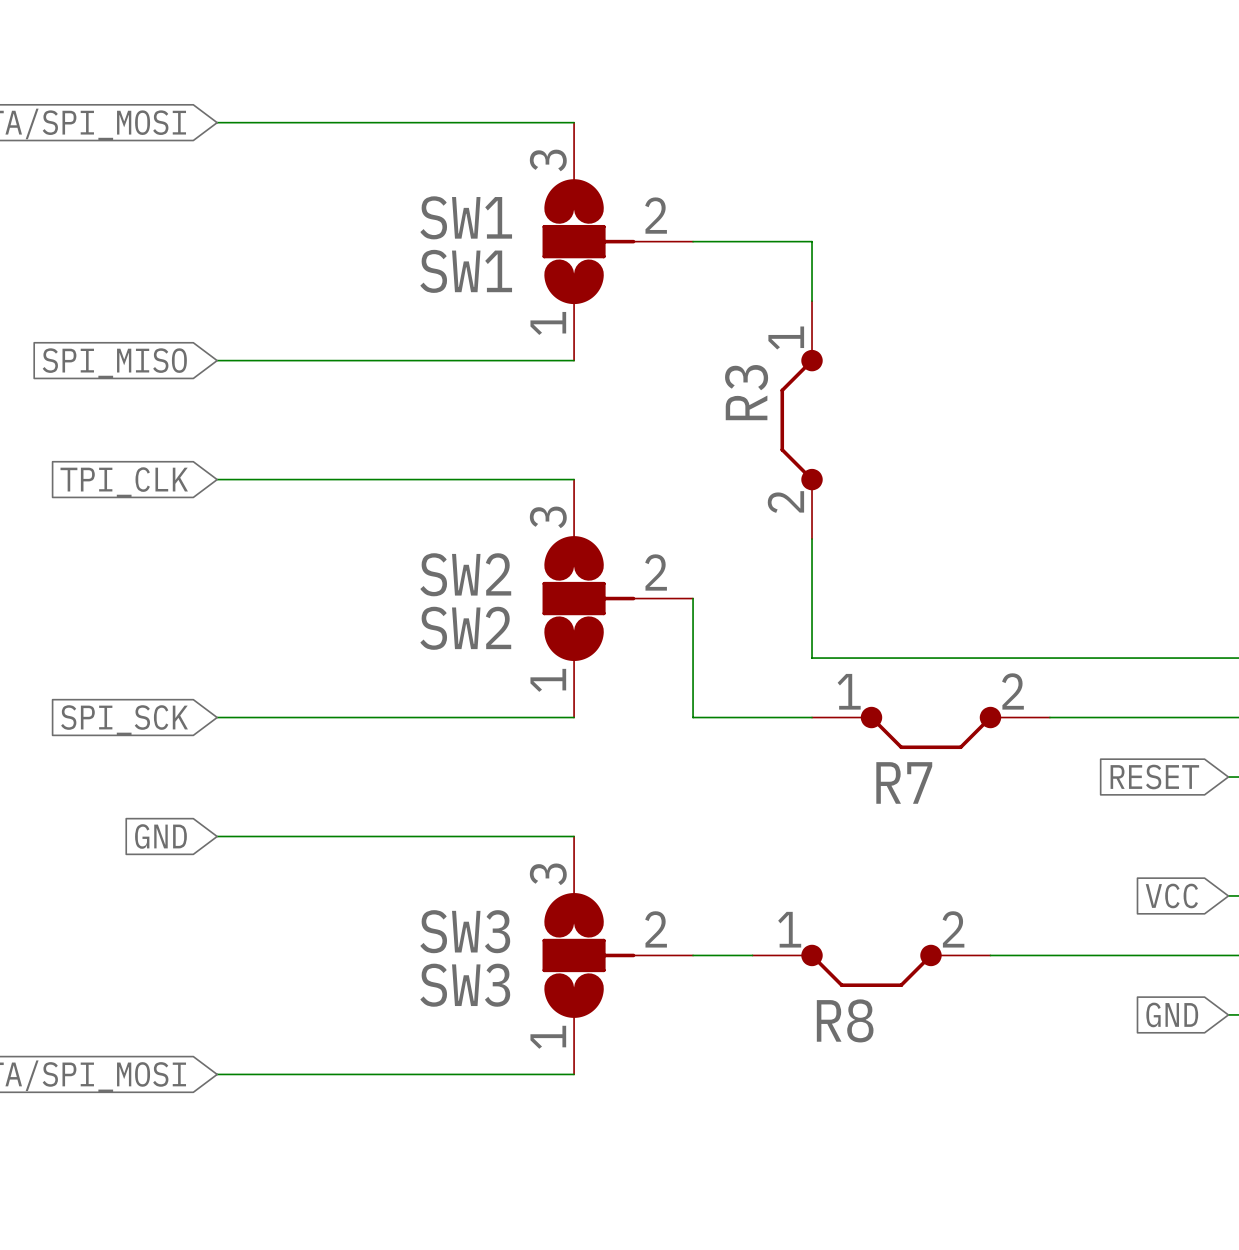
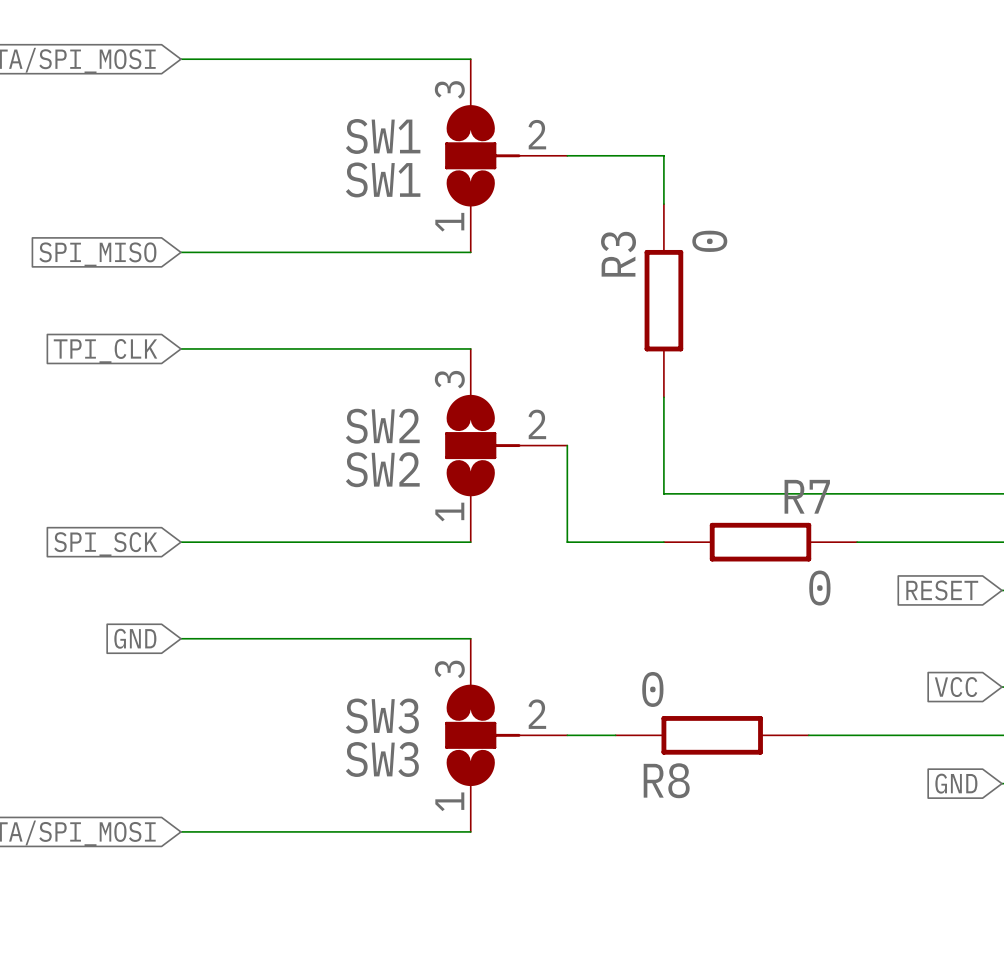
R3 symbol: [780, 301, 823, 540] -> [644, 204, 684, 398]
R3 value: none -> 0 (709, 241)
R7 symbol: [812, 706, 1050, 750] -> [663, 522, 858, 562]
R7 value: none -> 0 (819, 588)
R7 name position: R7 (904, 782) -> R7 (807, 496)
R8 value: none -> 0 (652, 689)
R8 symbol: [752, 944, 991, 987] -> [615, 716, 809, 755]

